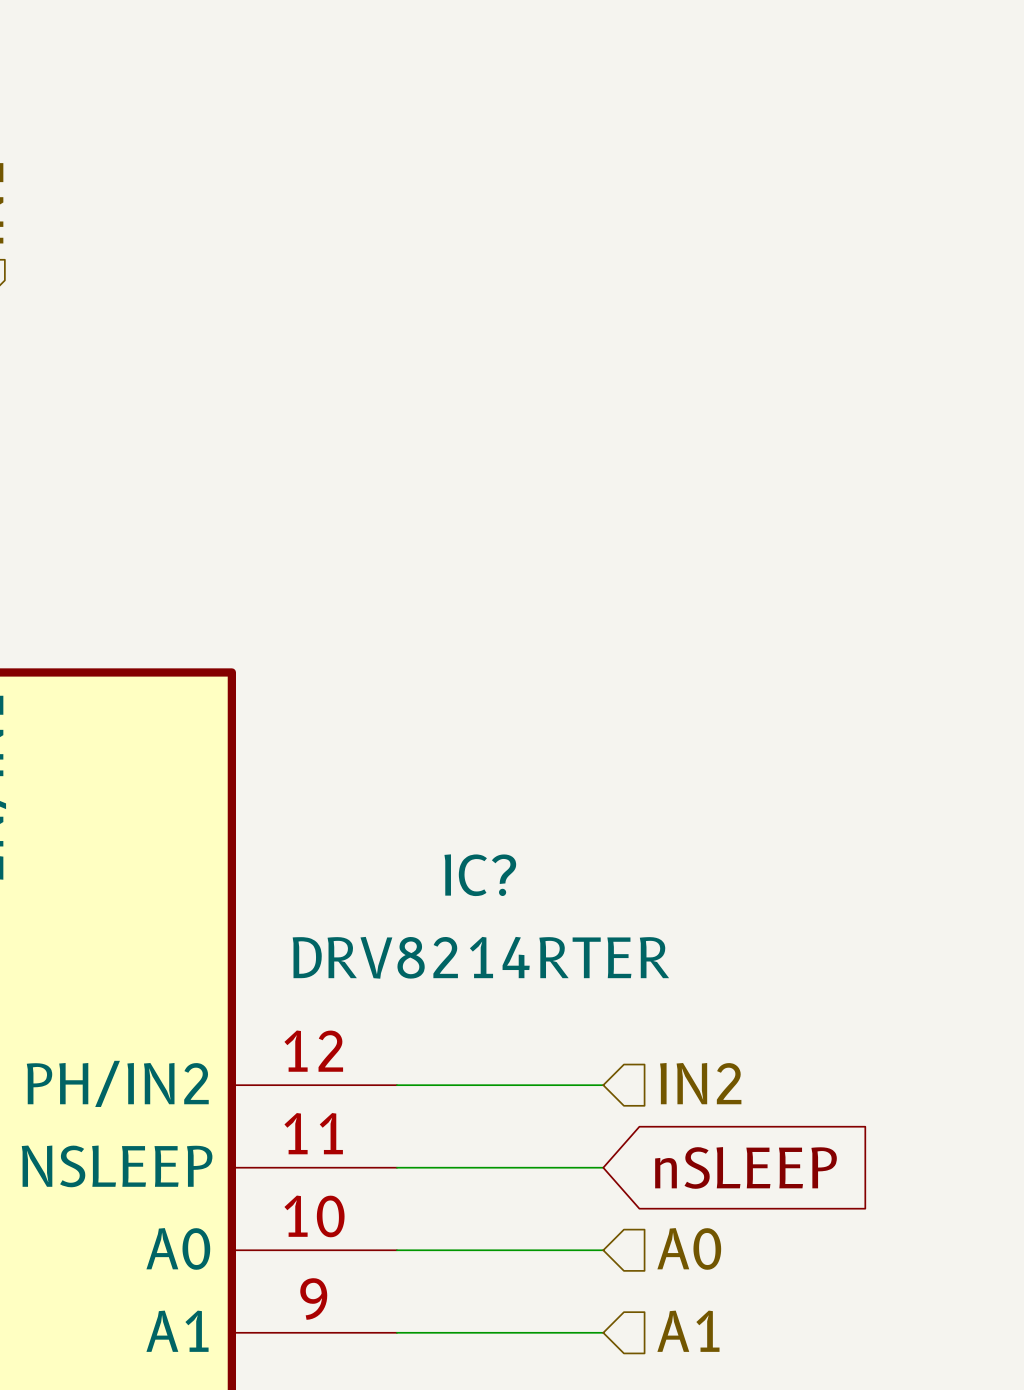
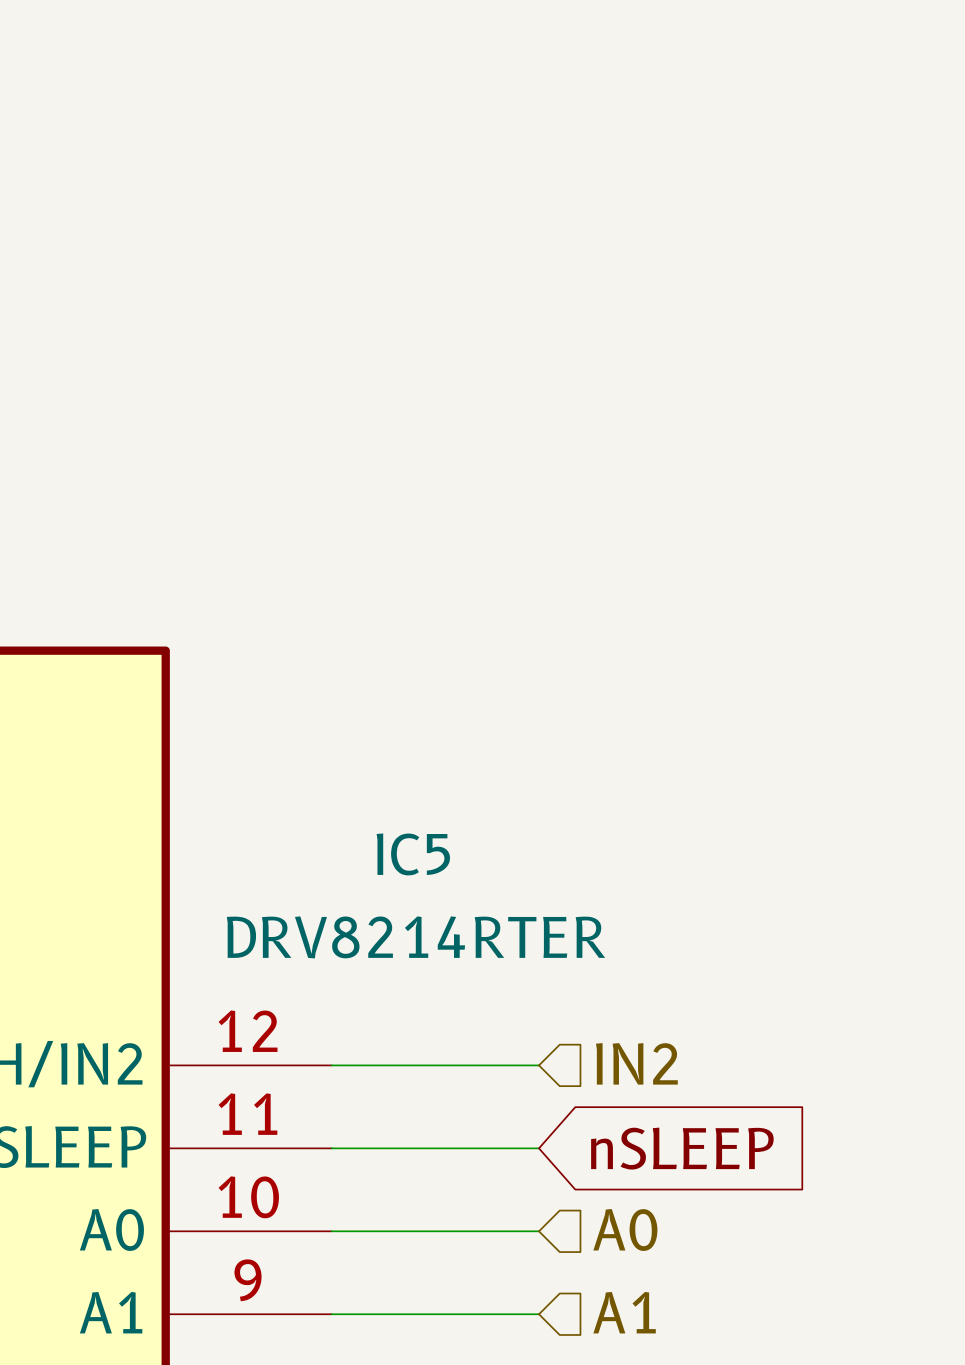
IC? name: IC? (480, 875) -> IC5 (413, 854)

